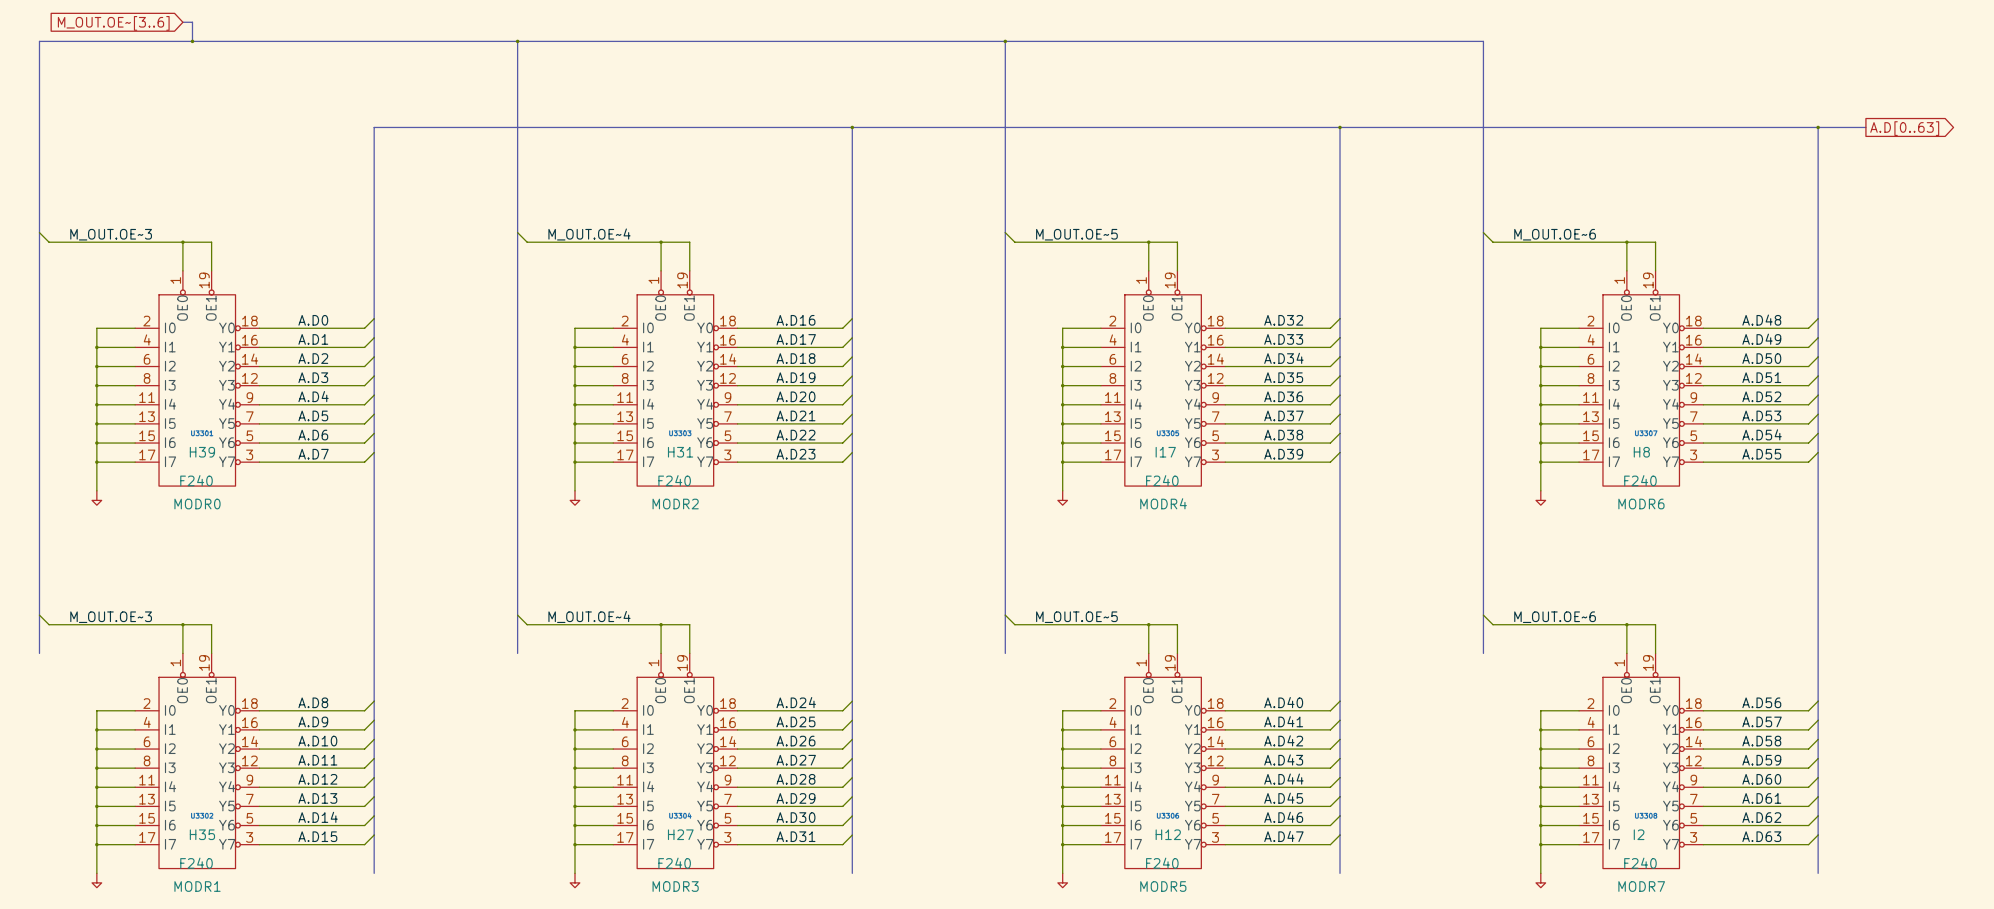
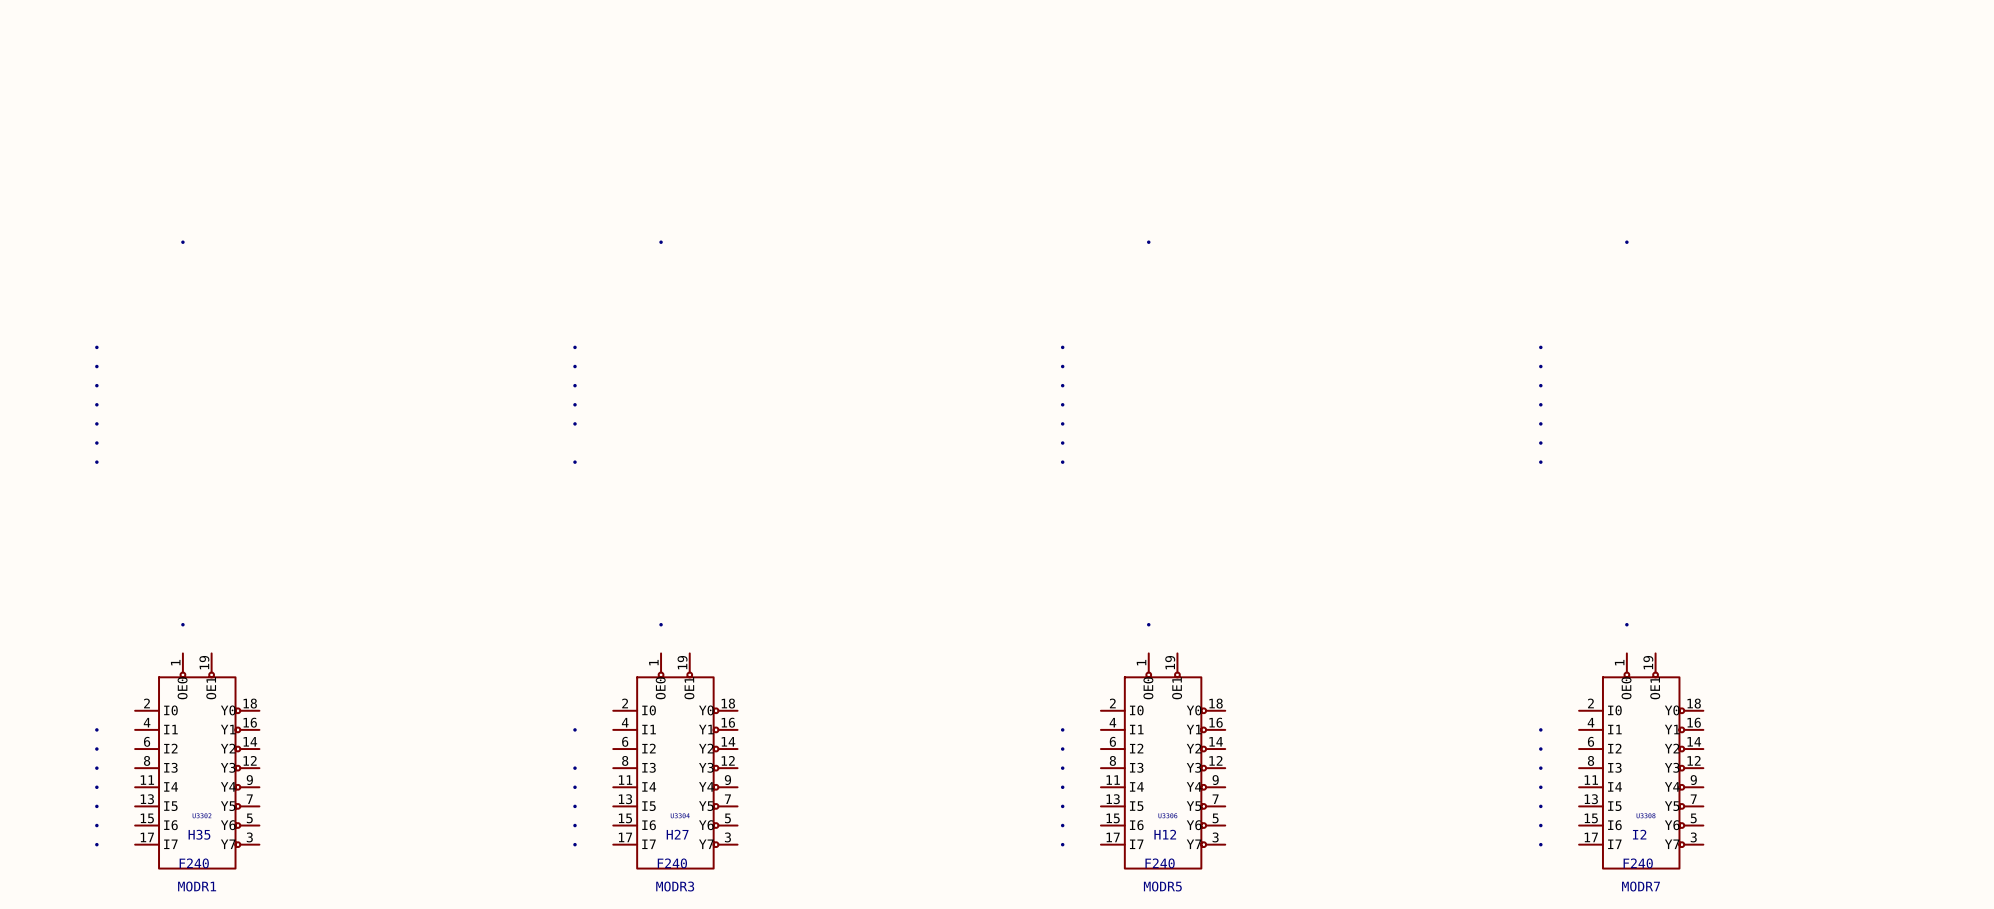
bus: (182, 22) (192, 22) (192, 41) -> none
global label: M_OUT.OE~[3..6] (113, 23) -> none
junction: (192, 41) -> none
bus: (517, 41) (517, 653) -> none
junction: (517, 41) -> none
bus: (1005, 41) (1005, 653) -> none
junction: (1005, 41) -> none
bus: (852, 127) (852, 873) -> none
junction: (852, 127) -> none
bus: (1340, 127) (1340, 873) -> none
junction: (1340, 127) -> none
bus: (1818, 127) (1818, 873) -> none
junction: (1818, 127) -> none
bus: (1865, 127) (374, 127) (374, 873) -> none
global label: A.D[0..63] (1904, 128) -> none
wire: (39, 232) (49, 242) (211, 242) (211, 270) -> none
wire: (517, 232) (527, 242) (689, 242) (689, 270) -> none
wire: (1005, 232) (1014, 242) (1177, 242) (1177, 270) -> none
wire: (1483, 232) (1493, 242) (1655, 242) (1655, 270) -> none
label: M_OUT.OE~3 (111, 234) -> none
label: M_OUT.OE~4 (589, 234) -> none
label: M_OUT.OE~5 (1076, 234) -> none
label: M_OUT.OE~6 (1555, 234) -> none
wire: (182, 242) (182, 270) -> none
wire: (661, 242) (661, 270) -> none
wire: (1148, 242) (1148, 270) -> none
wire: (1626, 242) (1626, 270) -> none
wire: (374, 318) (364, 328) (259, 328) -> none
wire: (852, 318) (842, 328) (737, 328) -> none
wire: (1340, 318) (1330, 328) (1225, 328) -> none
wire: (1818, 318) (1808, 328) (1703, 328) -> none
label: A.D0 (313, 320) -> none
label: A.D16 (795, 320) -> none
label: A.D32 (1283, 320) -> none
label: A.D48 (1761, 320) -> none
wire: (135, 328) (96, 328) (96, 490) -> none
wire: (613, 328) (574, 328) (574, 490) -> none
wire: (1100, 328) (1062, 328) (1062, 490) -> none
wire: (1579, 328) (1540, 328) (1540, 490) -> none
wire: (374, 337) (364, 347) (259, 347) -> none
wire: (852, 337) (842, 347) (737, 347) -> none
wire: (1340, 337) (1330, 347) (1225, 347) -> none
wire: (1818, 337) (1808, 347) (1703, 347) -> none
label: A.D1 (313, 339) -> none
label: A.D17 (796, 339) -> none
label: A.D33 (1283, 339) -> none
label: A.D49 (1761, 339) -> none
wire: (96, 347) (135, 347) -> none
wire: (574, 347) (613, 347) -> none
wire: (1062, 347) (1100, 347) -> none
wire: (1540, 347) (1579, 347) -> none
wire: (374, 356) (364, 366) (259, 366) -> none
wire: (852, 356) (842, 366) (737, 366) -> none
wire: (1340, 356) (1330, 366) (1225, 366) -> none
wire: (1818, 356) (1808, 366) (1703, 366) -> none
label: A.D2 (313, 358) -> none
label: A.D18 (795, 358) -> none
label: A.D34 (1283, 358) -> none
label: A.D50 (1761, 358) -> none
wire: (96, 366) (135, 366) -> none
wire: (574, 366) (613, 366) -> none
wire: (1062, 366) (1100, 366) -> none
wire: (1540, 366) (1579, 366) -> none
wire: (374, 376) (364, 385) (259, 385) -> none
wire: (852, 376) (842, 385) (737, 385) -> none
wire: (1340, 376) (1330, 385) (1225, 385) -> none
wire: (1818, 376) (1808, 385) (1703, 385) -> none
label: A.D3 (313, 377) -> none
label: A.D19 (795, 377) -> none
label: A.D35 (1283, 377) -> none
label: A.D51 (1761, 377) -> none
part: F240 (197, 378) -> none
part: F240 (675, 378) -> none
part: F240 (1163, 378) -> none
part: F240 (1641, 378) -> none
wire: (96, 385) (135, 385) -> none
wire: (574, 385) (613, 385) -> none
wire: (1062, 385) (1100, 385) -> none
wire: (1540, 385) (1579, 385) -> none
wire: (374, 395) (364, 404) (259, 404) -> none
wire: (852, 395) (842, 404) (737, 404) -> none
wire: (1340, 395) (1330, 404) (1225, 404) -> none
wire: (1818, 395) (1808, 404) (1703, 404) -> none
label: A.D4 (313, 396) -> none
label: A.D20 (795, 396) -> none
label: A.D36 (1283, 396) -> none
label: A.D52 (1761, 396) -> none
wire: (96, 404) (135, 404) -> none
wire: (574, 404) (613, 404) -> none
wire: (1062, 404) (1100, 404) -> none
wire: (1540, 404) (1579, 404) -> none
wire: (374, 414) (364, 423) (259, 423) -> none
wire: (852, 414) (842, 423) (737, 423) -> none
wire: (1340, 414) (1330, 423) (1225, 423) -> none
wire: (1818, 414) (1808, 423) (1703, 423) -> none
label: A.D5 (313, 415) -> none
label: A.D21 (795, 415) -> none
label: A.D37 (1283, 415) -> none
label: A.D53 (1761, 415) -> none
wire: (96, 423) (135, 423) -> none
wire: (574, 423) (613, 423) -> none
wire: (1062, 423) (1100, 423) -> none
wire: (1540, 423) (1579, 423) -> none
wire: (374, 433) (364, 443) (259, 443) -> none
wire: (852, 433) (842, 443) (737, 443) -> none
wire: (1340, 433) (1330, 443) (1225, 443) -> none
wire: (1818, 433) (1808, 443) (1703, 443) -> none
label: A.D54 (1762, 434) -> none
label: A.D6 (313, 435) -> none
label: A.D22 (795, 435) -> none
label: A.D38 (1283, 435) -> none
wire: (96, 443) (135, 443) -> none
wire: (574, 443) (613, 443) -> none
junction: (574, 443) -> none
wire: (1062, 443) (1100, 443) -> none
wire: (1540, 443) (1579, 443) -> none
wire: (374, 452) (364, 462) (259, 462) -> none
wire: (852, 452) (842, 462) (737, 462) -> none
wire: (1340, 452) (1330, 462) (1225, 462) -> none
wire: (1818, 452) (1808, 462) (1703, 462) -> none
label: A.D7 (313, 454) -> none
label: A.D23 (795, 454) -> none
label: A.D39 (1283, 454) -> none
label: A.D55 (1761, 454) -> none
wire: (96, 462) (135, 462) -> none
wire: (574, 462) (613, 462) -> none
wire: (1062, 462) (1100, 462) -> none
wire: (1540, 462) (1579, 462) -> none
power symbol: (96, 498) -> none
power symbol: (574, 498) -> none
power symbol: (1062, 498) -> none
power symbol: (1540, 498) -> none
wire: (39, 615) (49, 624) (211, 624) (211, 653) -> none
wire: (517, 615) (527, 624) (689, 624) (689, 653) -> none
wire: (1005, 615) (1014, 624) (1177, 624) (1177, 653) -> none
wire: (1483, 615) (1493, 624) (1655, 624) (1655, 653) -> none
label: M_OUT.OE~4 (589, 616) -> none
label: M_OUT.OE~3 (111, 617) -> none
label: M_OUT.OE~5 (1076, 617) -> none
label: M_OUT.OE~6 (1555, 617) -> none
wire: (182, 624) (182, 653) -> none
wire: (661, 624) (661, 653) -> none
wire: (1148, 624) (1148, 653) -> none
wire: (1626, 624) (1626, 653) -> none
bus: (39, 653) (39, 41) (1483, 41) (1483, 653) -> none
wire: (374, 701) (364, 710) (259, 710) -> none
wire: (852, 701) (842, 710) (737, 710) -> none
wire: (1340, 701) (1330, 710) (1225, 710) -> none
wire: (1818, 701) (1808, 710) (1703, 710) -> none
label: A.D8 (313, 702) -> none
label: A.D24 (796, 702) -> none
label: A.D40 (1283, 702) -> none
label: A.D56 (1761, 702) -> none
wire: (135, 710) (96, 710) (96, 873) -> none
wire: (613, 710) (574, 710) (574, 873) -> none
wire: (1100, 710) (1062, 710) (1062, 873) -> none
wire: (1579, 710) (1540, 710) (1540, 873) -> none
wire: (374, 720) (364, 729) (259, 729) -> none
wire: (852, 720) (842, 729) (737, 729) -> none
wire: (1340, 720) (1330, 729) (1225, 729) -> none
wire: (1818, 720) (1808, 729) (1703, 729) -> none
label: A.D9 (313, 721) -> none
label: A.D25 (795, 721) -> none
label: A.D41 (1283, 721) -> none
label: A.D57 (1762, 721) -> none
wire: (96, 729) (135, 729) -> none
wire: (574, 729) (613, 729) -> none
wire: (1062, 729) (1100, 729) -> none
wire: (1540, 729) (1579, 729) -> none
wire: (374, 739) (364, 749) (259, 749) -> none
wire: (852, 739) (842, 749) (737, 749) -> none
wire: (1340, 739) (1330, 749) (1225, 749) -> none
wire: (1818, 739) (1808, 749) (1703, 749) -> none
label: A.D42 (1283, 740) -> none
label: A.D10 (317, 741) -> none
label: A.D26 (795, 741) -> none
label: A.D58 (1761, 741) -> none
wire: (96, 749) (135, 749) -> none
wire: (574, 749) (613, 749) -> none
junction: (574, 749) -> none
wire: (1062, 749) (1100, 749) -> none
wire: (1540, 749) (1579, 749) -> none
wire: (374, 758) (364, 768) (259, 768) -> none
wire: (852, 758) (842, 768) (737, 768) -> none
wire: (1340, 758) (1330, 768) (1225, 768) -> none
wire: (1818, 758) (1808, 768) (1703, 768) -> none
label: A.D43 (1283, 759) -> none
label: A.D11 (317, 760) -> none
label: A.D27 (796, 760) -> none
label: A.D59 (1761, 760) -> none
wire: (96, 768) (135, 768) -> none
wire: (574, 768) (613, 768) -> none
wire: (1062, 768) (1100, 768) -> none
wire: (1540, 768) (1579, 768) -> none
wire: (374, 777) (364, 787) (259, 787) -> none
wire: (852, 777) (842, 787) (737, 787) -> none
wire: (1340, 777) (1330, 787) (1225, 787) -> none
wire: (1818, 777) (1808, 787) (1703, 787) -> none
label: A.D12 (317, 779) -> none
label: A.D28 (795, 779) -> none
label: A.D44 (1283, 779) -> none
label: A.D60 (1761, 779) -> none
wire: (96, 787) (135, 787) -> none
wire: (574, 787) (613, 787) -> none
wire: (1062, 787) (1100, 787) -> none
wire: (1540, 787) (1579, 787) -> none
wire: (374, 796) (364, 806) (259, 806) -> none
wire: (852, 796) (842, 806) (737, 806) -> none
wire: (1340, 796) (1330, 806) (1225, 806) -> none
wire: (1818, 796) (1808, 806) (1703, 806) -> none
label: A.D13 (317, 798) -> none
label: A.D29 (795, 798) -> none
label: A.D45 (1283, 798) -> none
label: A.D61 (1761, 798) -> none
wire: (96, 806) (135, 806) -> none
wire: (574, 806) (613, 806) -> none
wire: (1062, 806) (1100, 806) -> none
wire: (1540, 806) (1579, 806) -> none
wire: (374, 815) (364, 825) (259, 825) -> none
wire: (852, 815) (842, 825) (737, 825) -> none
wire: (1340, 815) (1330, 825) (1225, 825) -> none
wire: (1818, 815) (1808, 825) (1703, 825) -> none
label: A.D14 (318, 817) -> none
label: A.D30 (795, 817) -> none
label: A.D46 (1283, 817) -> none
label: A.D62 (1761, 817) -> none
wire: (96, 825) (135, 825) -> none
wire: (574, 825) (613, 825) -> none
wire: (1062, 825) (1100, 825) -> none
wire: (1540, 825) (1579, 825) -> none
wire: (374, 835) (364, 844) (259, 844) -> none
wire: (852, 835) (842, 844) (737, 844) -> none
wire: (1340, 835) (1330, 844) (1225, 844) -> none
wire: (1818, 835) (1808, 844) (1703, 844) -> none
label: A.D15 (317, 836) -> none
label: A.D31 (795, 836) -> none
label: A.D47 (1283, 836) -> none
label: A.D63 (1761, 836) -> none
wire: (96, 844) (135, 844) -> none
wire: (574, 844) (613, 844) -> none
wire: (1062, 844) (1100, 844) -> none
wire: (1540, 844) (1579, 844) -> none
power symbol: (96, 880) -> none
power symbol: (574, 880) -> none
power symbol: (1062, 880) -> none
power symbol: (1540, 880) -> none

